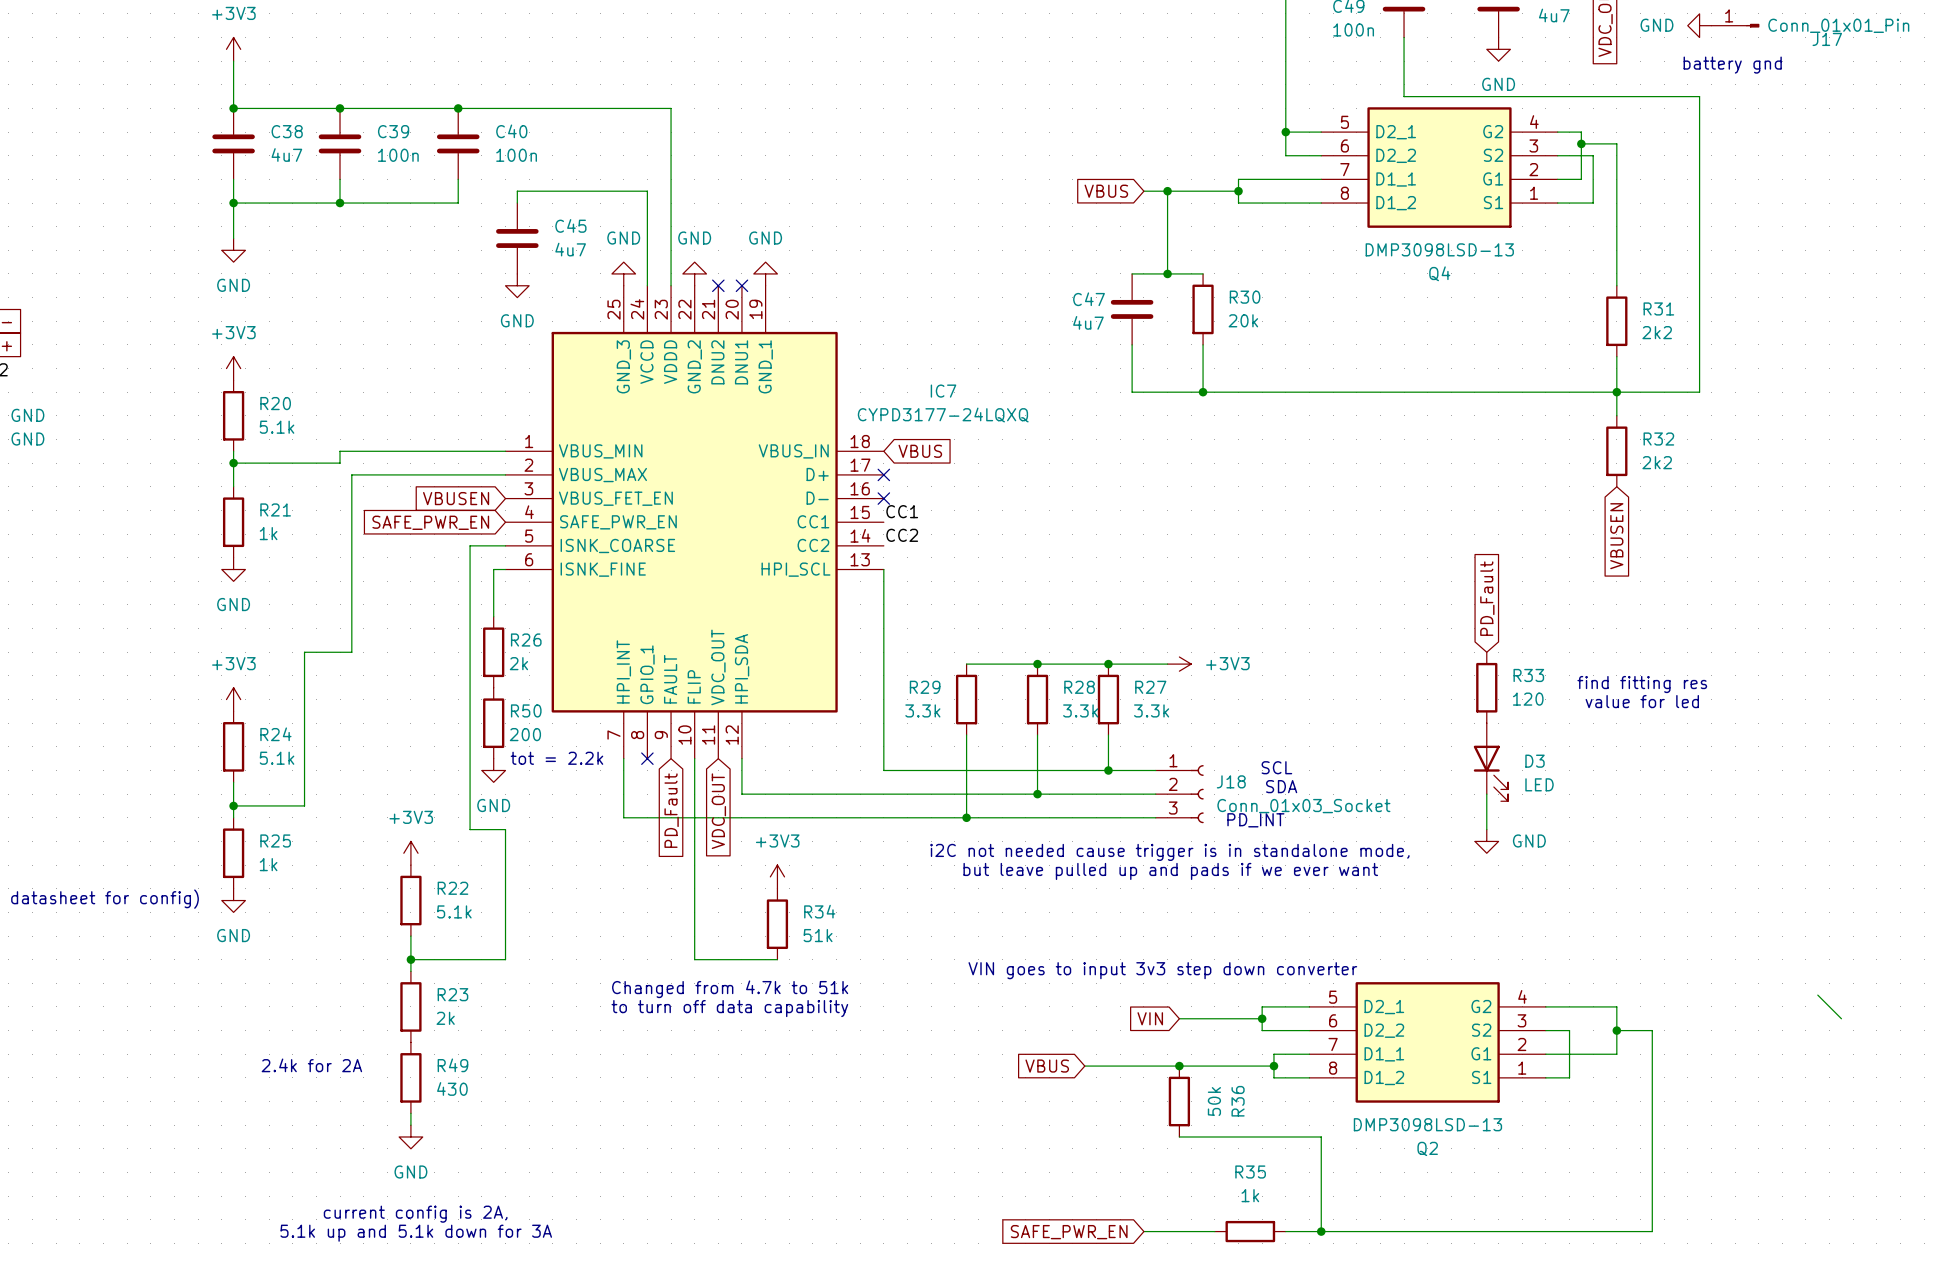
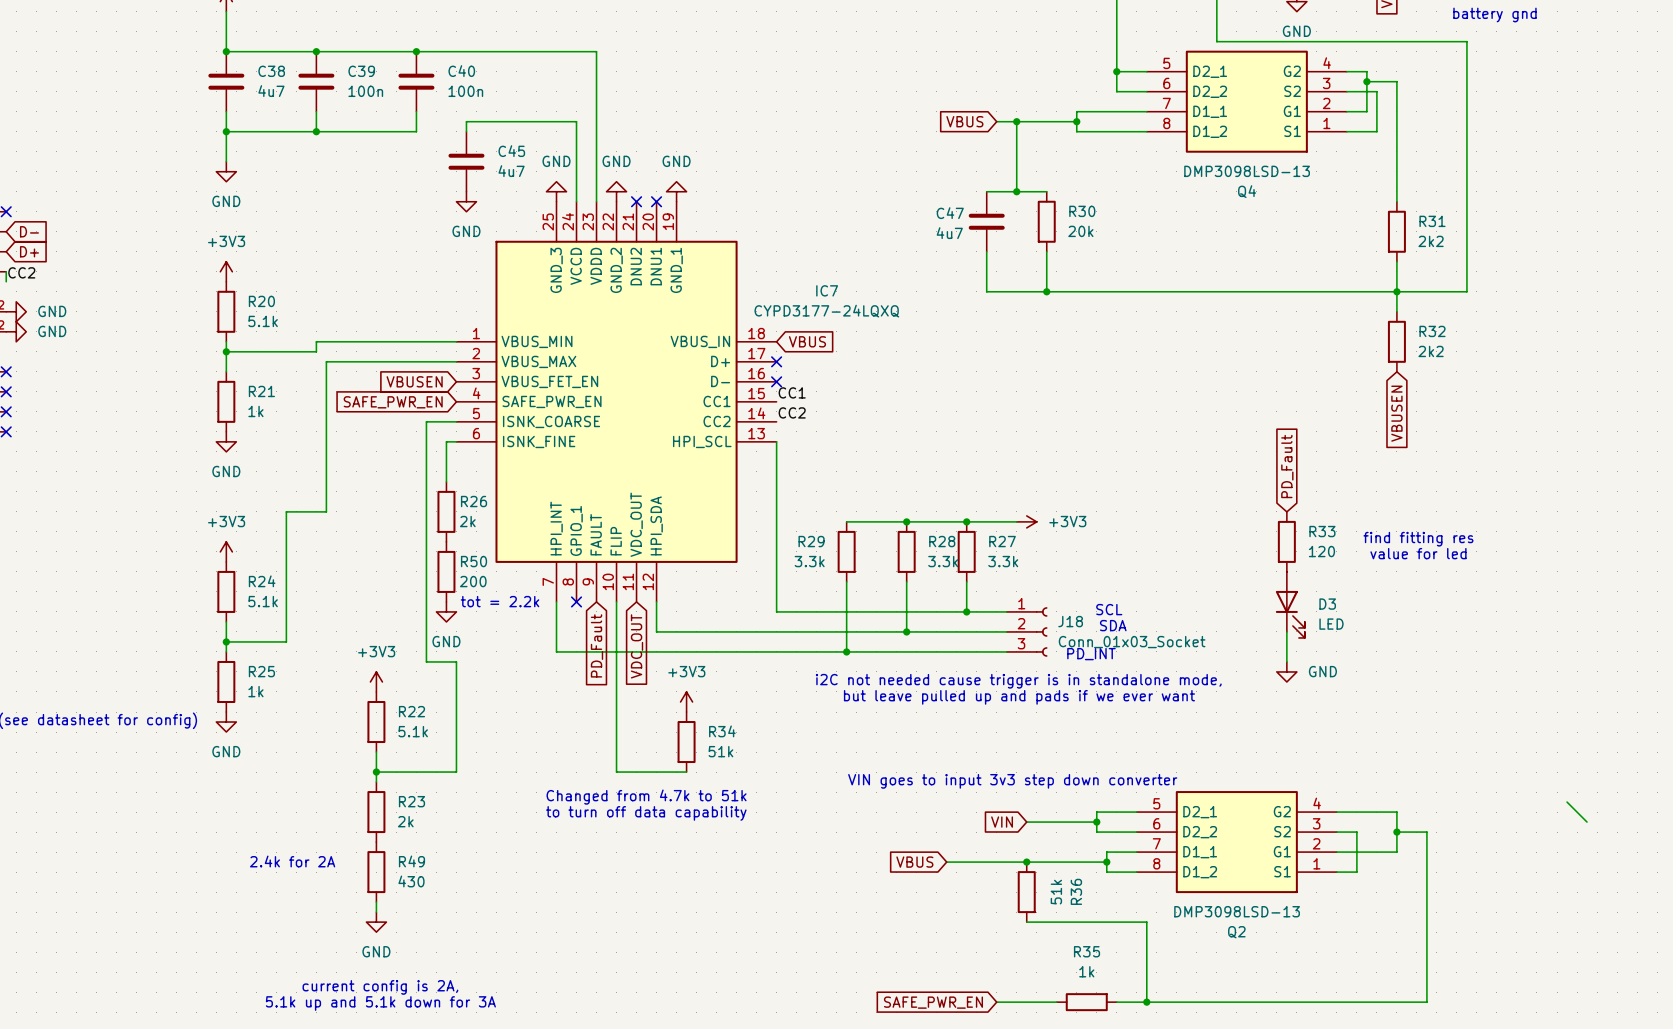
R36 value: 50k (1214, 1101) -> 51k (1056, 892)

